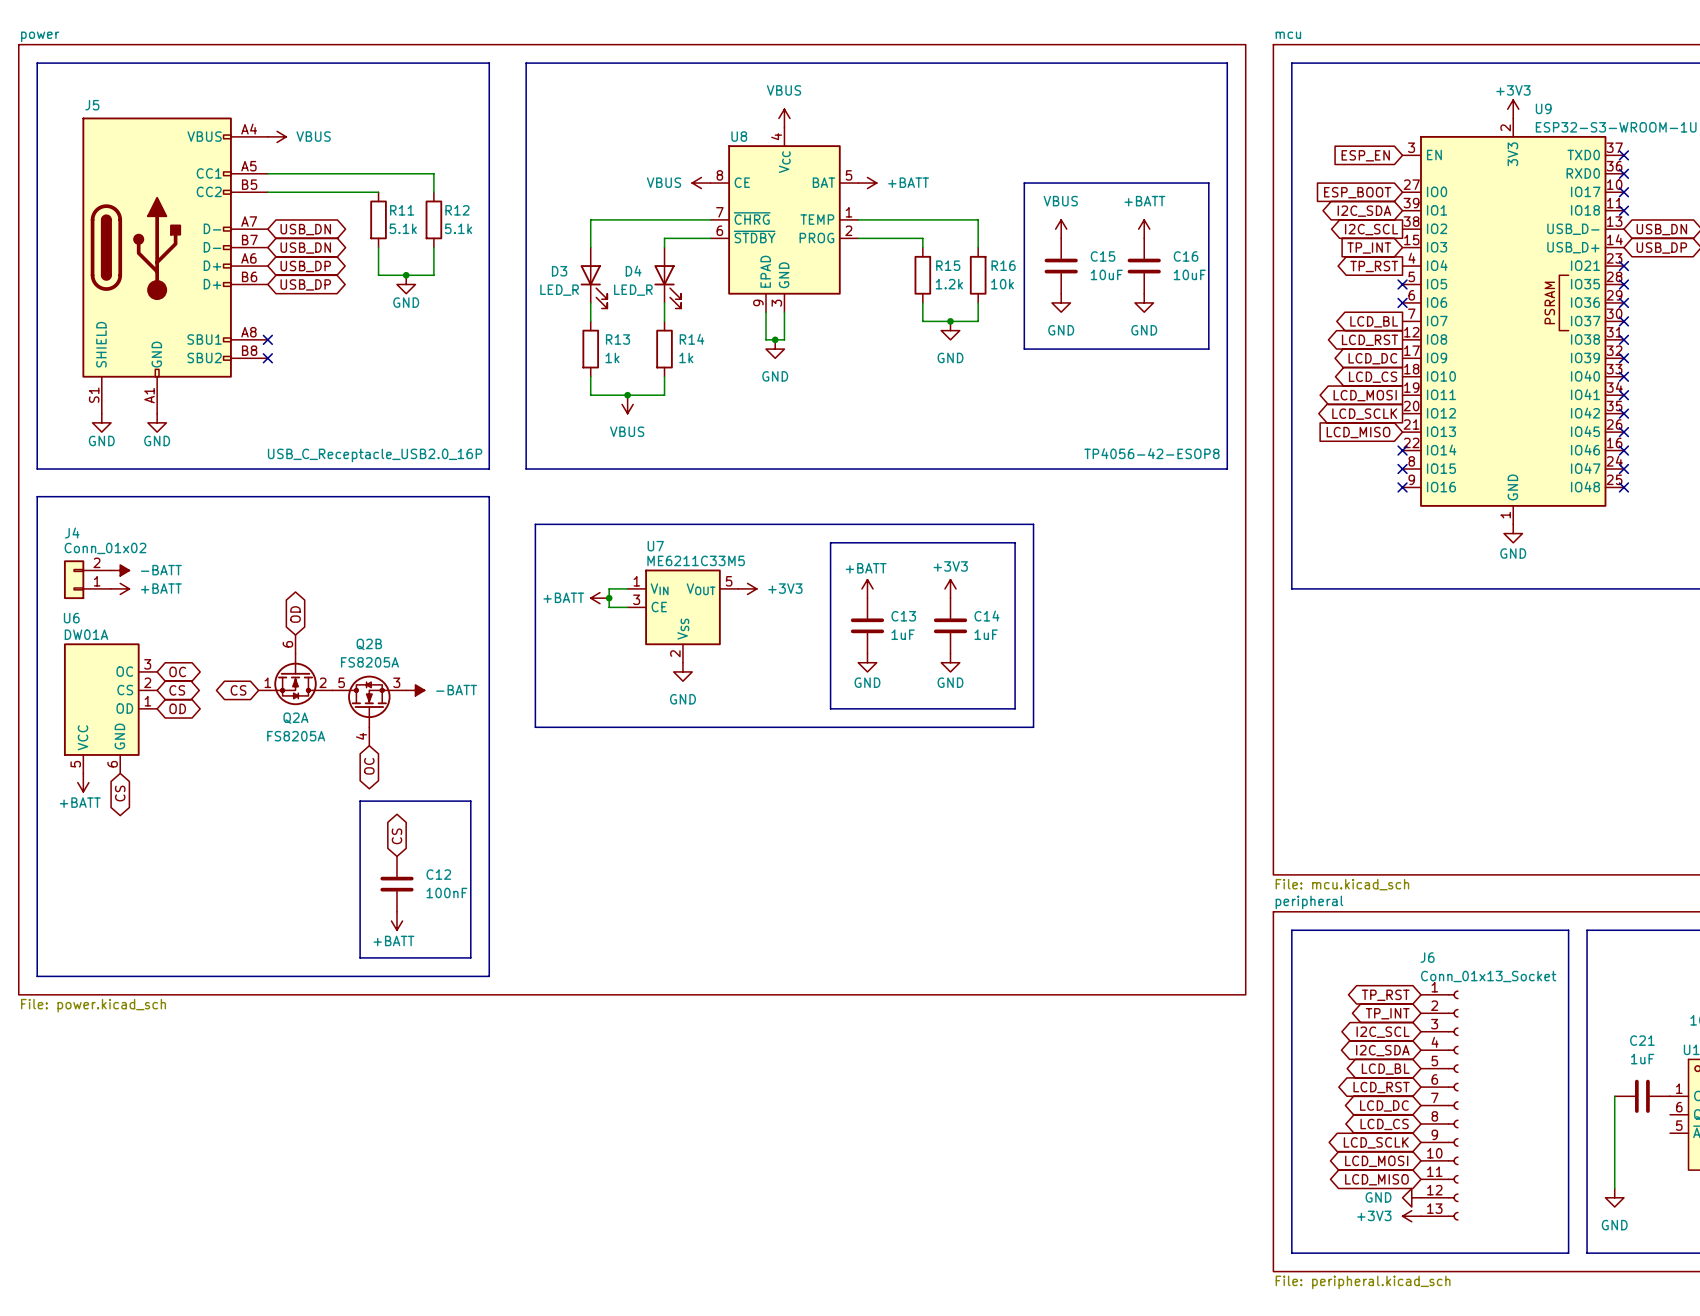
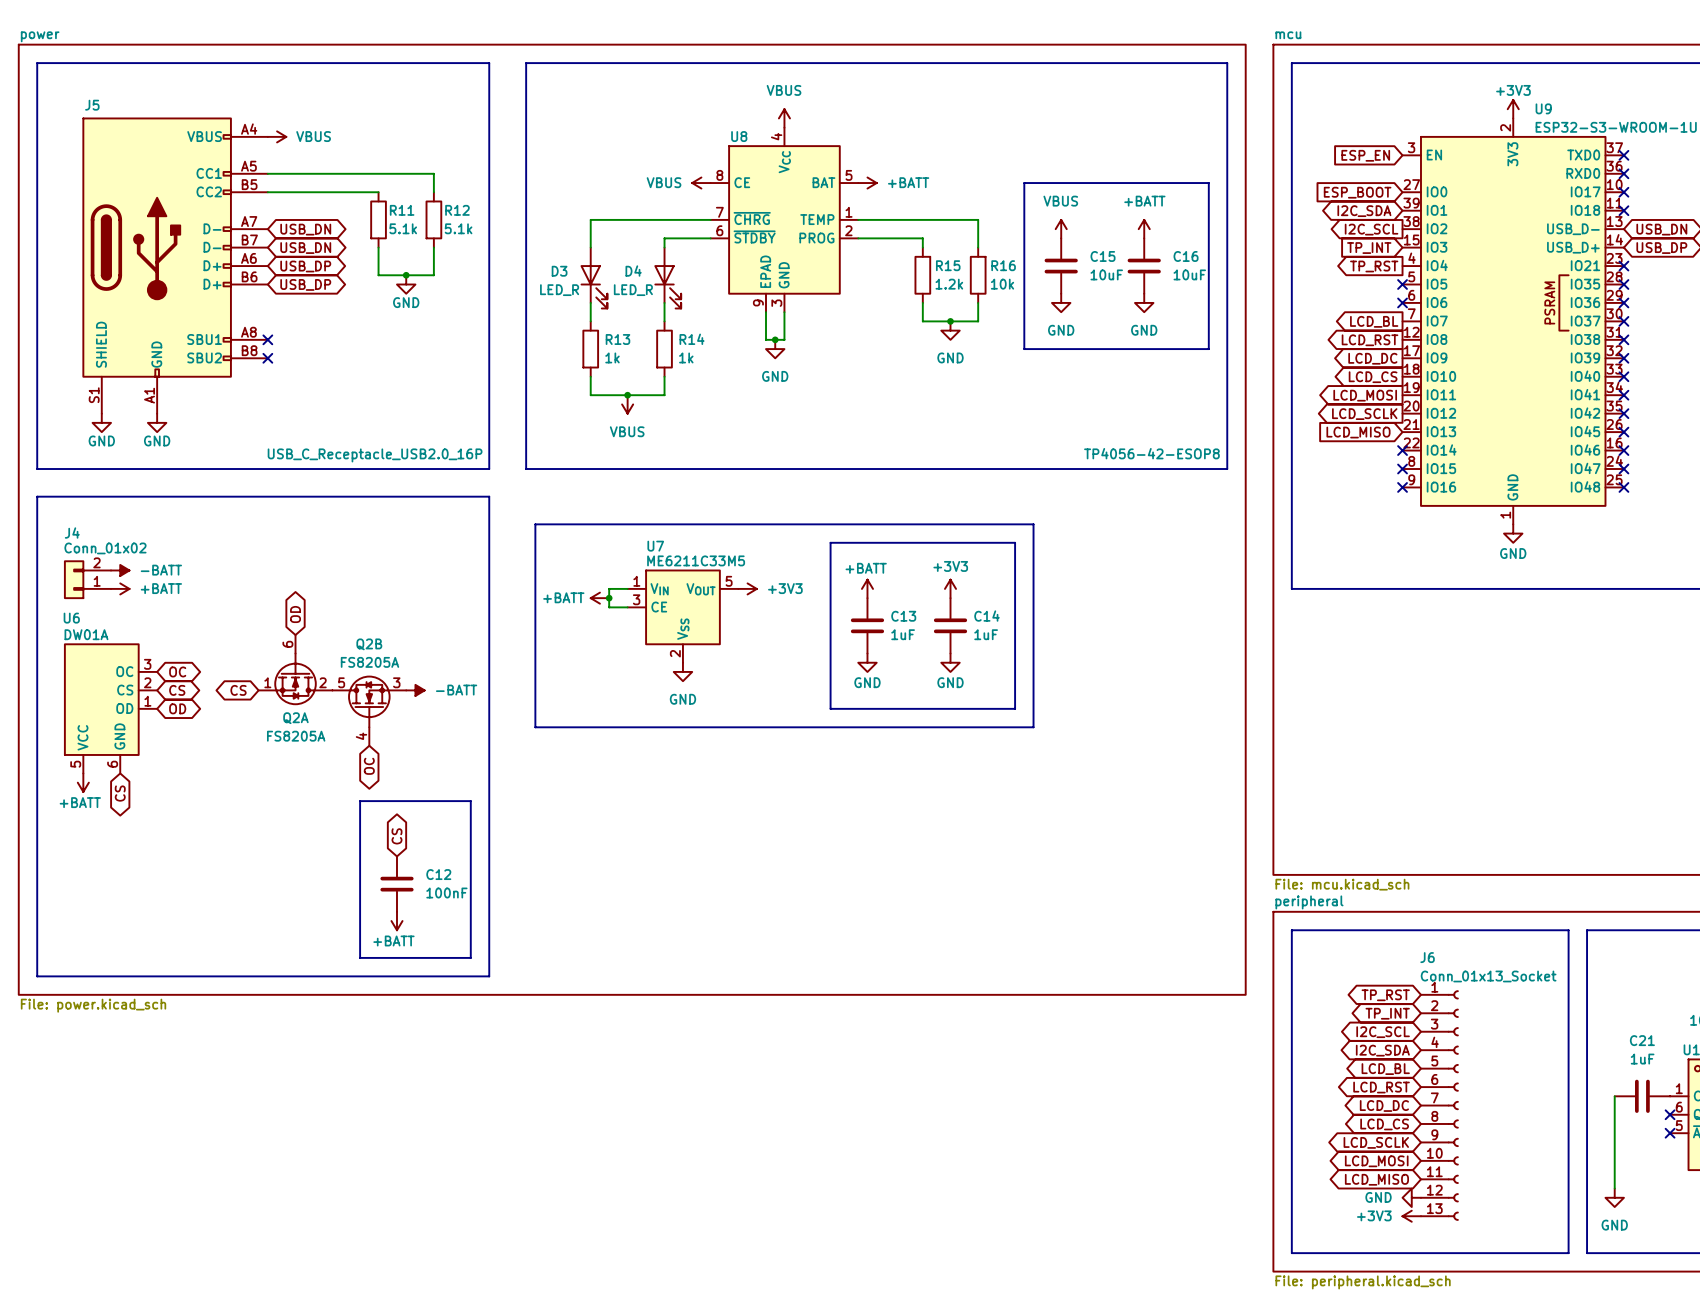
no-connect mark: none -> (1670, 1114)
no-connect mark: none -> (1670, 1133)

